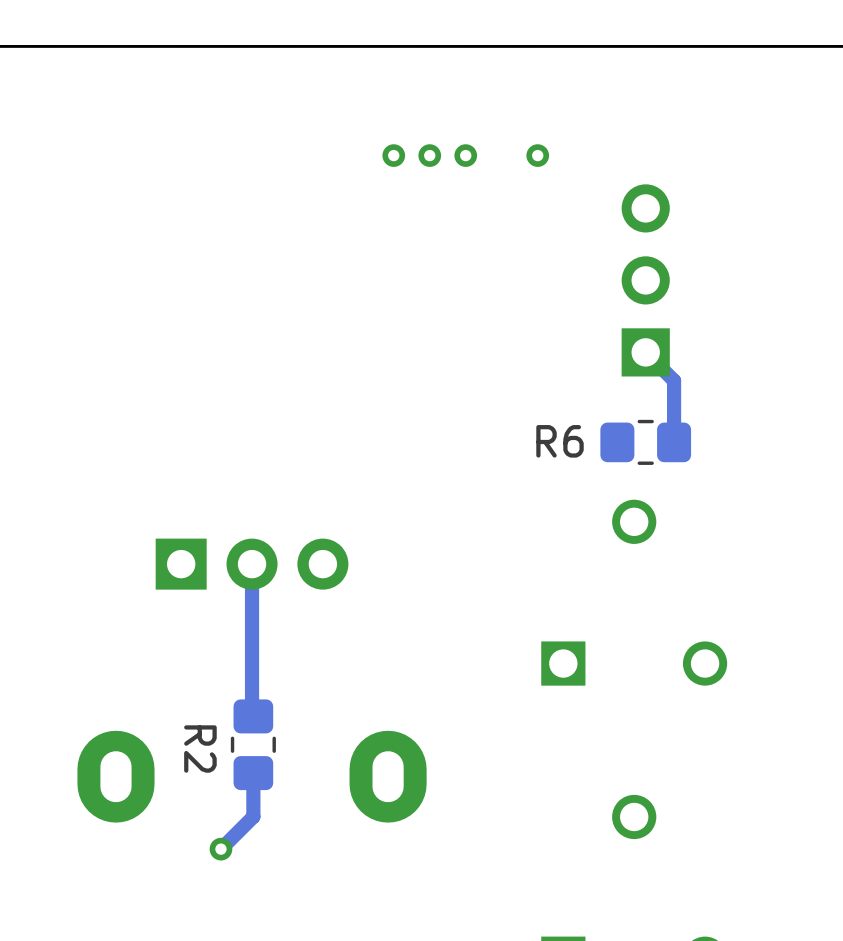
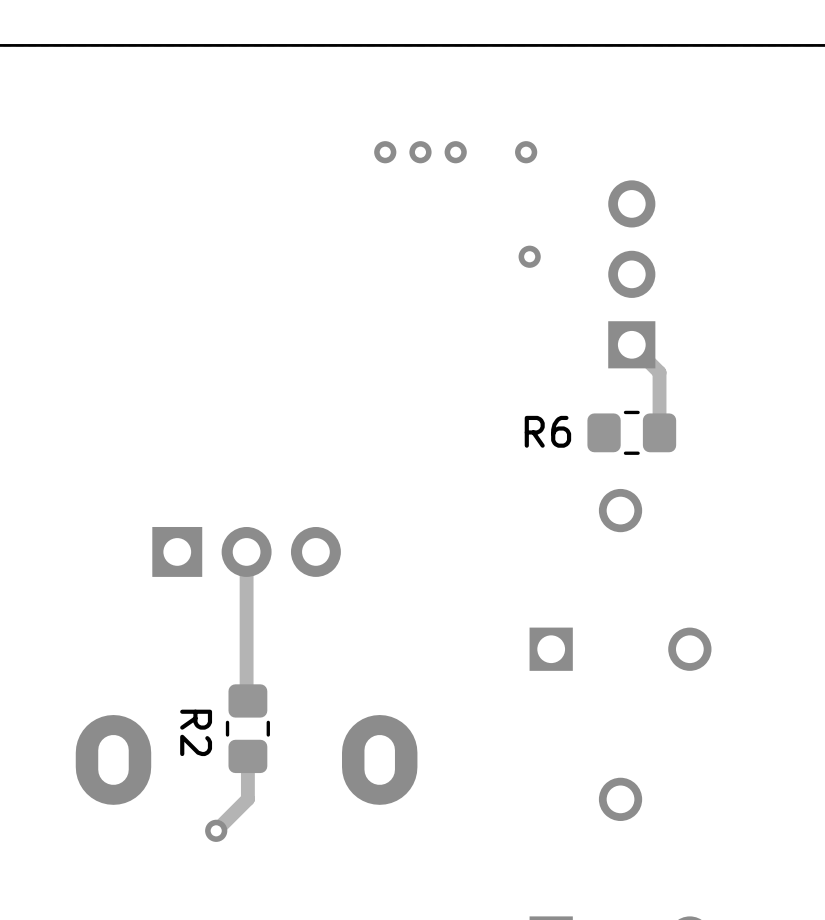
via: none -> (529, 256)

